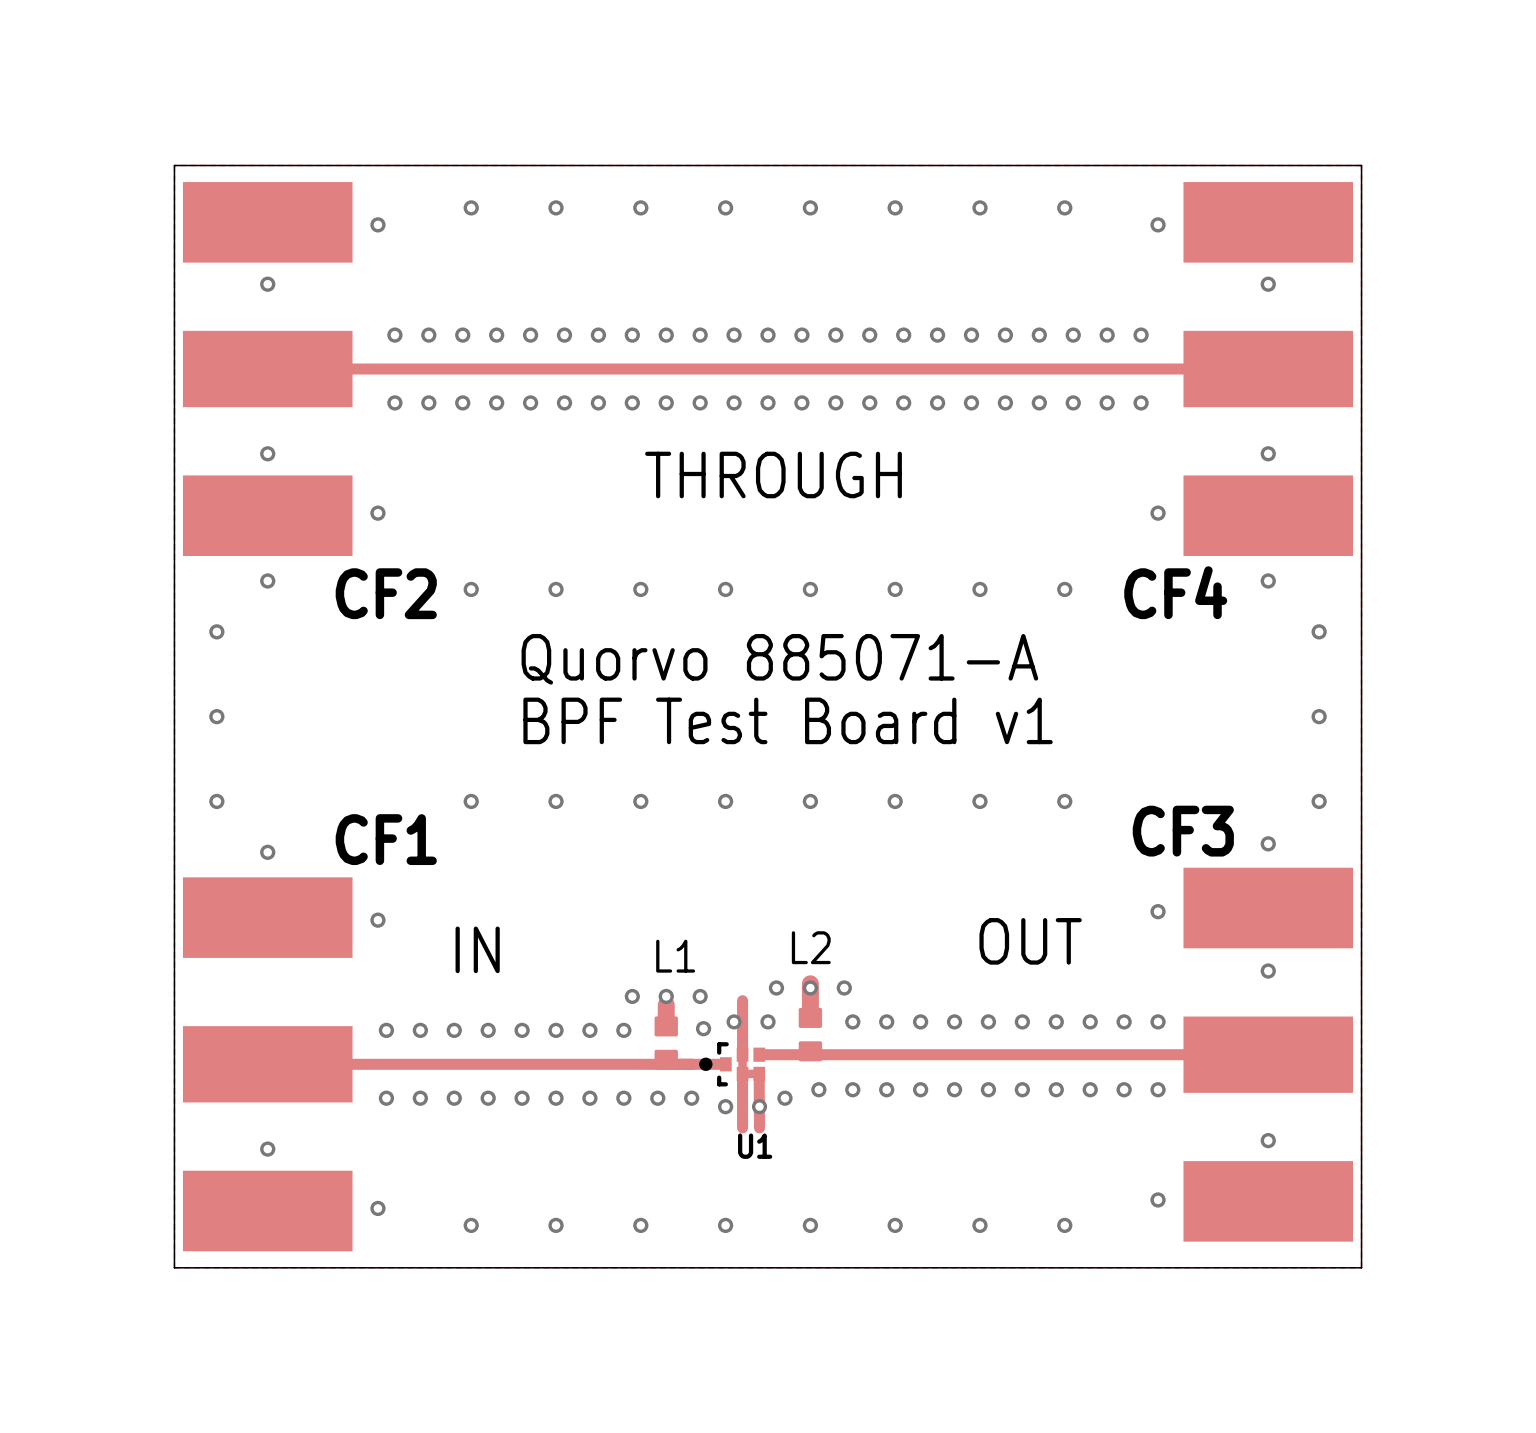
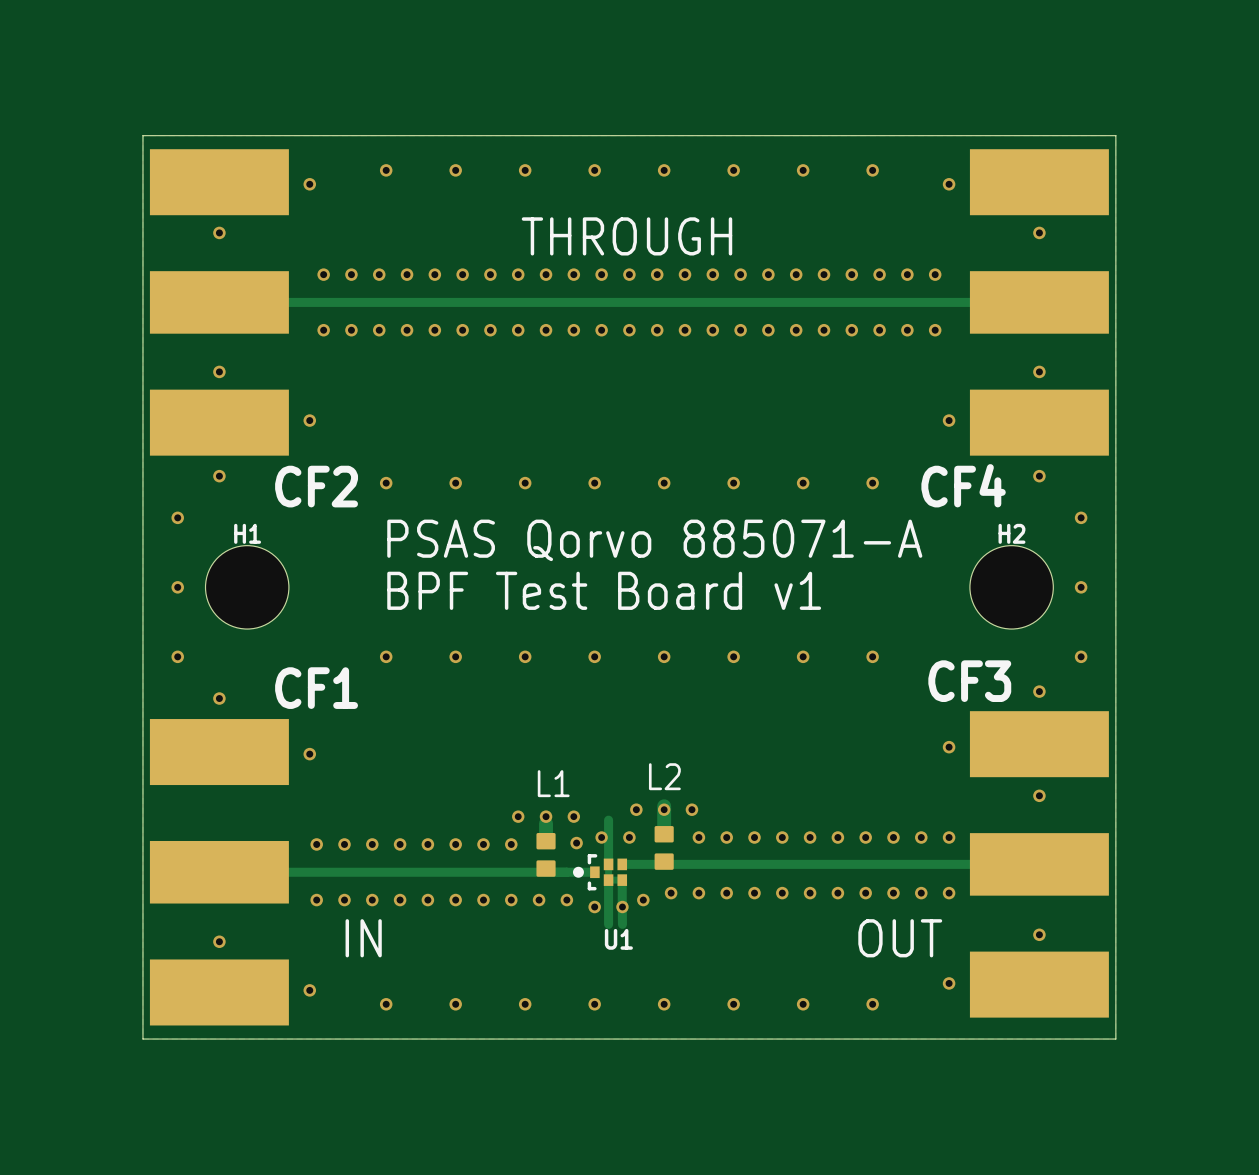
text position: THROUGH (773, 475) -> THROUGH (626, 236)
text: Quorvo 885071-A (779, 659) -> PSAS Qorvo 885071-A (654, 540)
H1: none -> (247, 587)
H2: none -> (1011, 587)
text position: BPF Test Board v1 (788, 720) -> BPF Test Board v1 (604, 590)
text position: OUT (1030, 941) -> OUT (900, 938)
text position: IN (477, 949) -> IN (363, 938)

